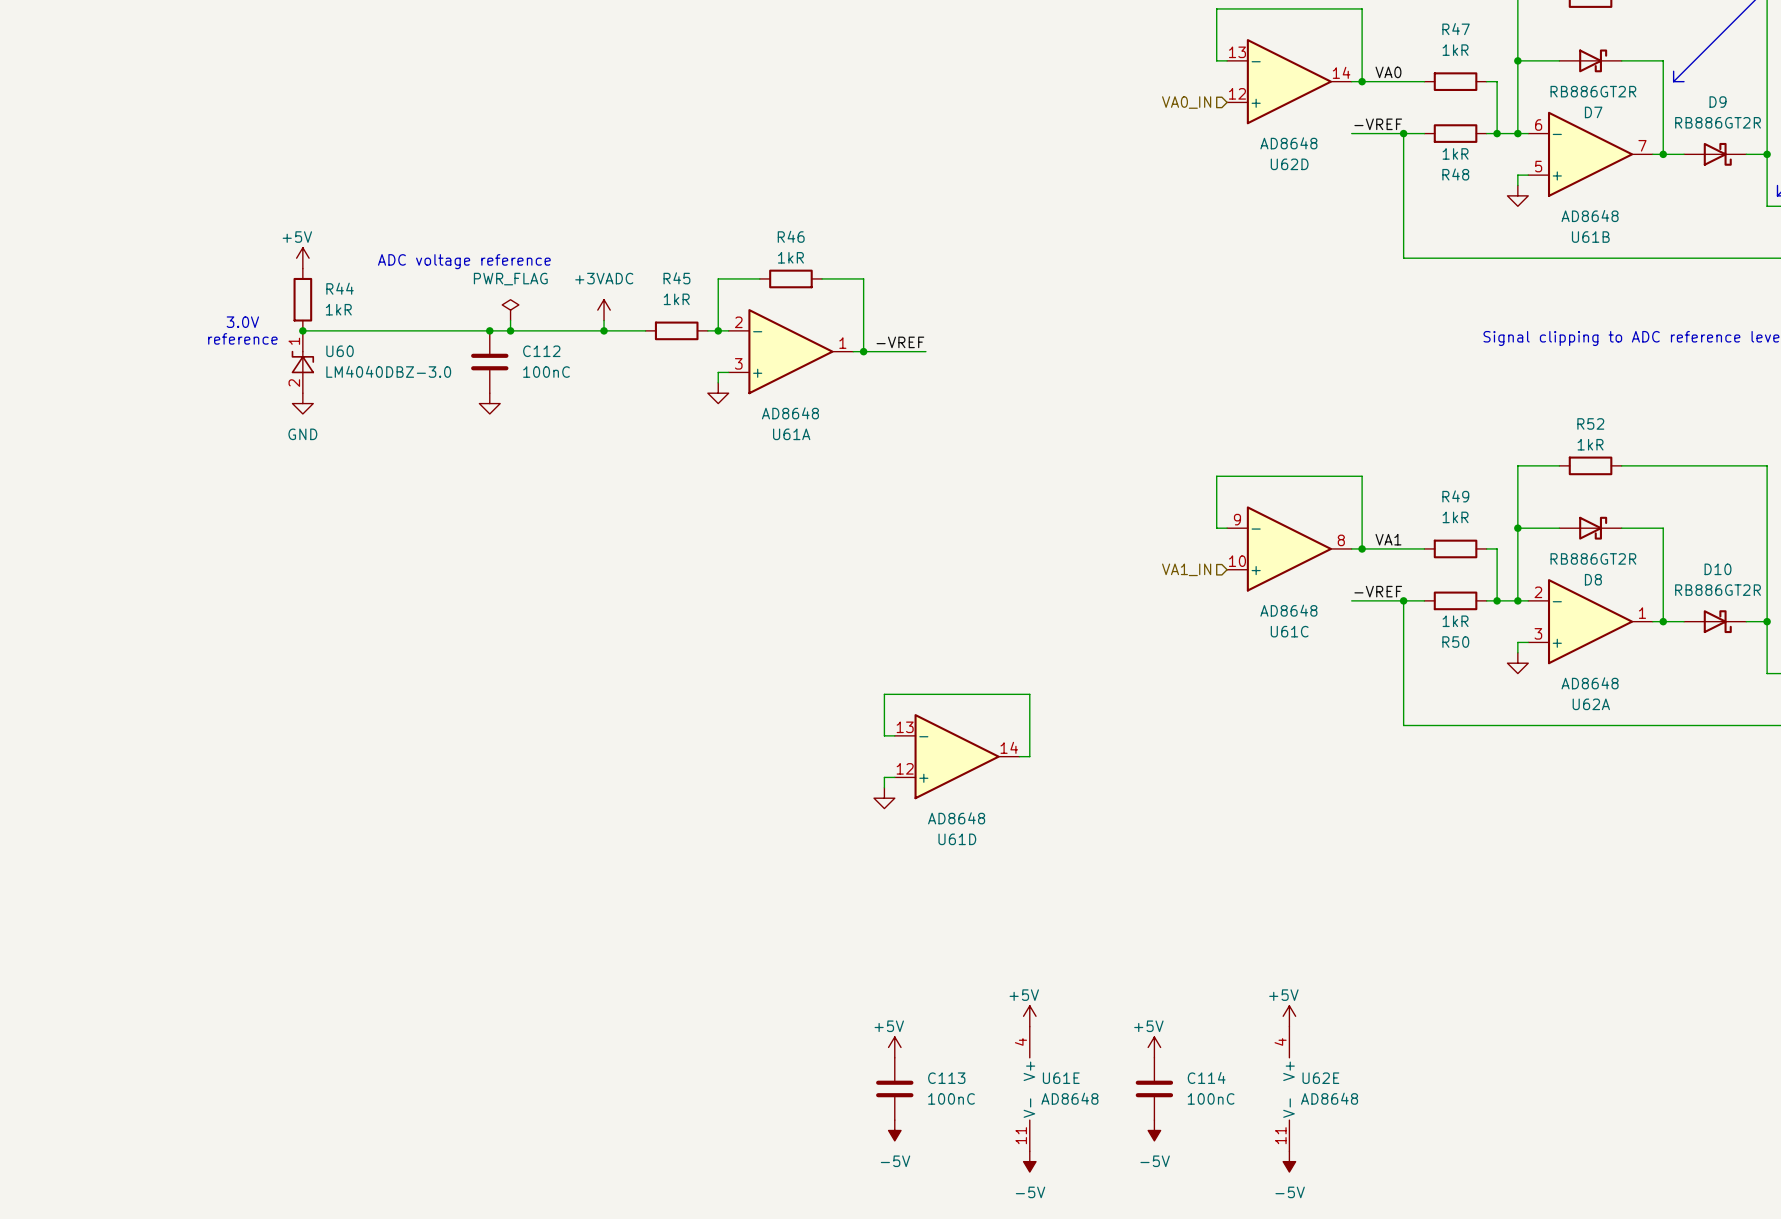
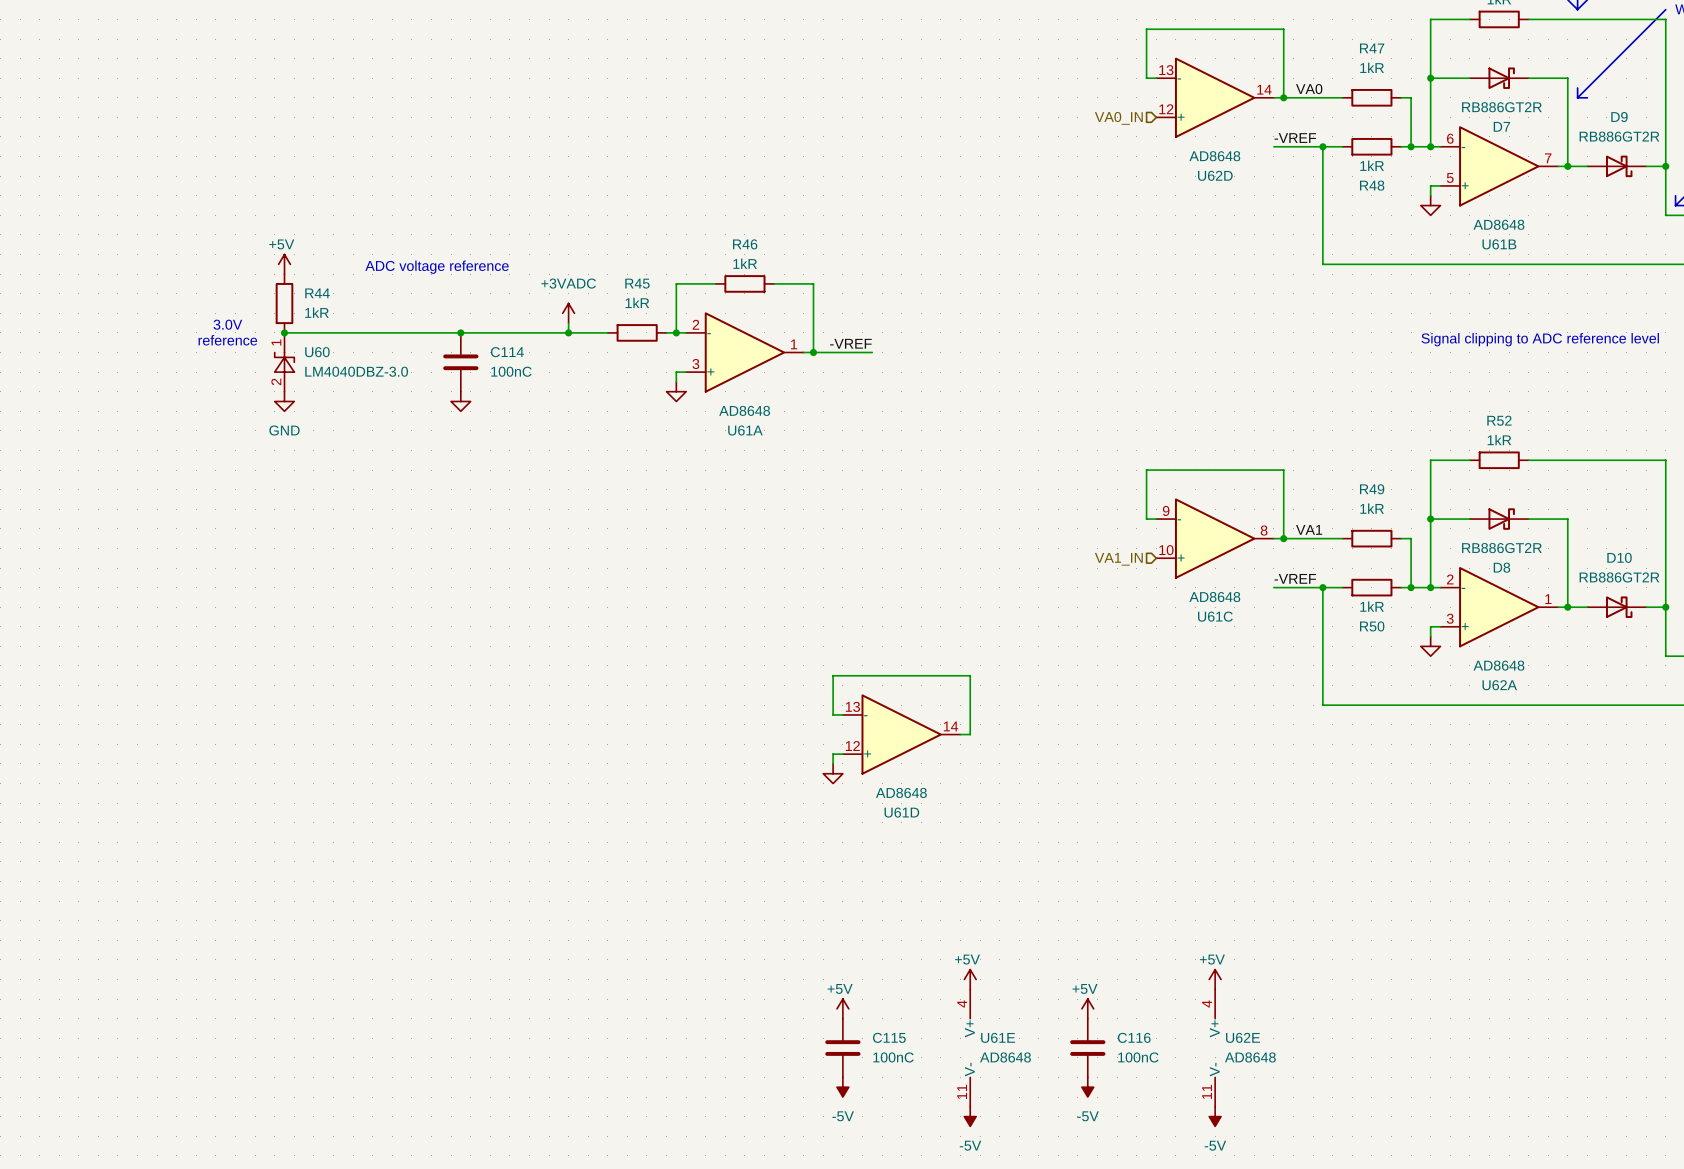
power symbol: PWR_FLAG (510, 310) -> none
wire: (510, 320) (510, 330) -> none
junction: (510, 330) -> none
C112 name: C112 (541, 351) -> C114 (507, 352)
C114 name: C114 (1206, 1077) -> C116 (1134, 1037)
C113 name: C113 (946, 1078) -> C115 (889, 1037)

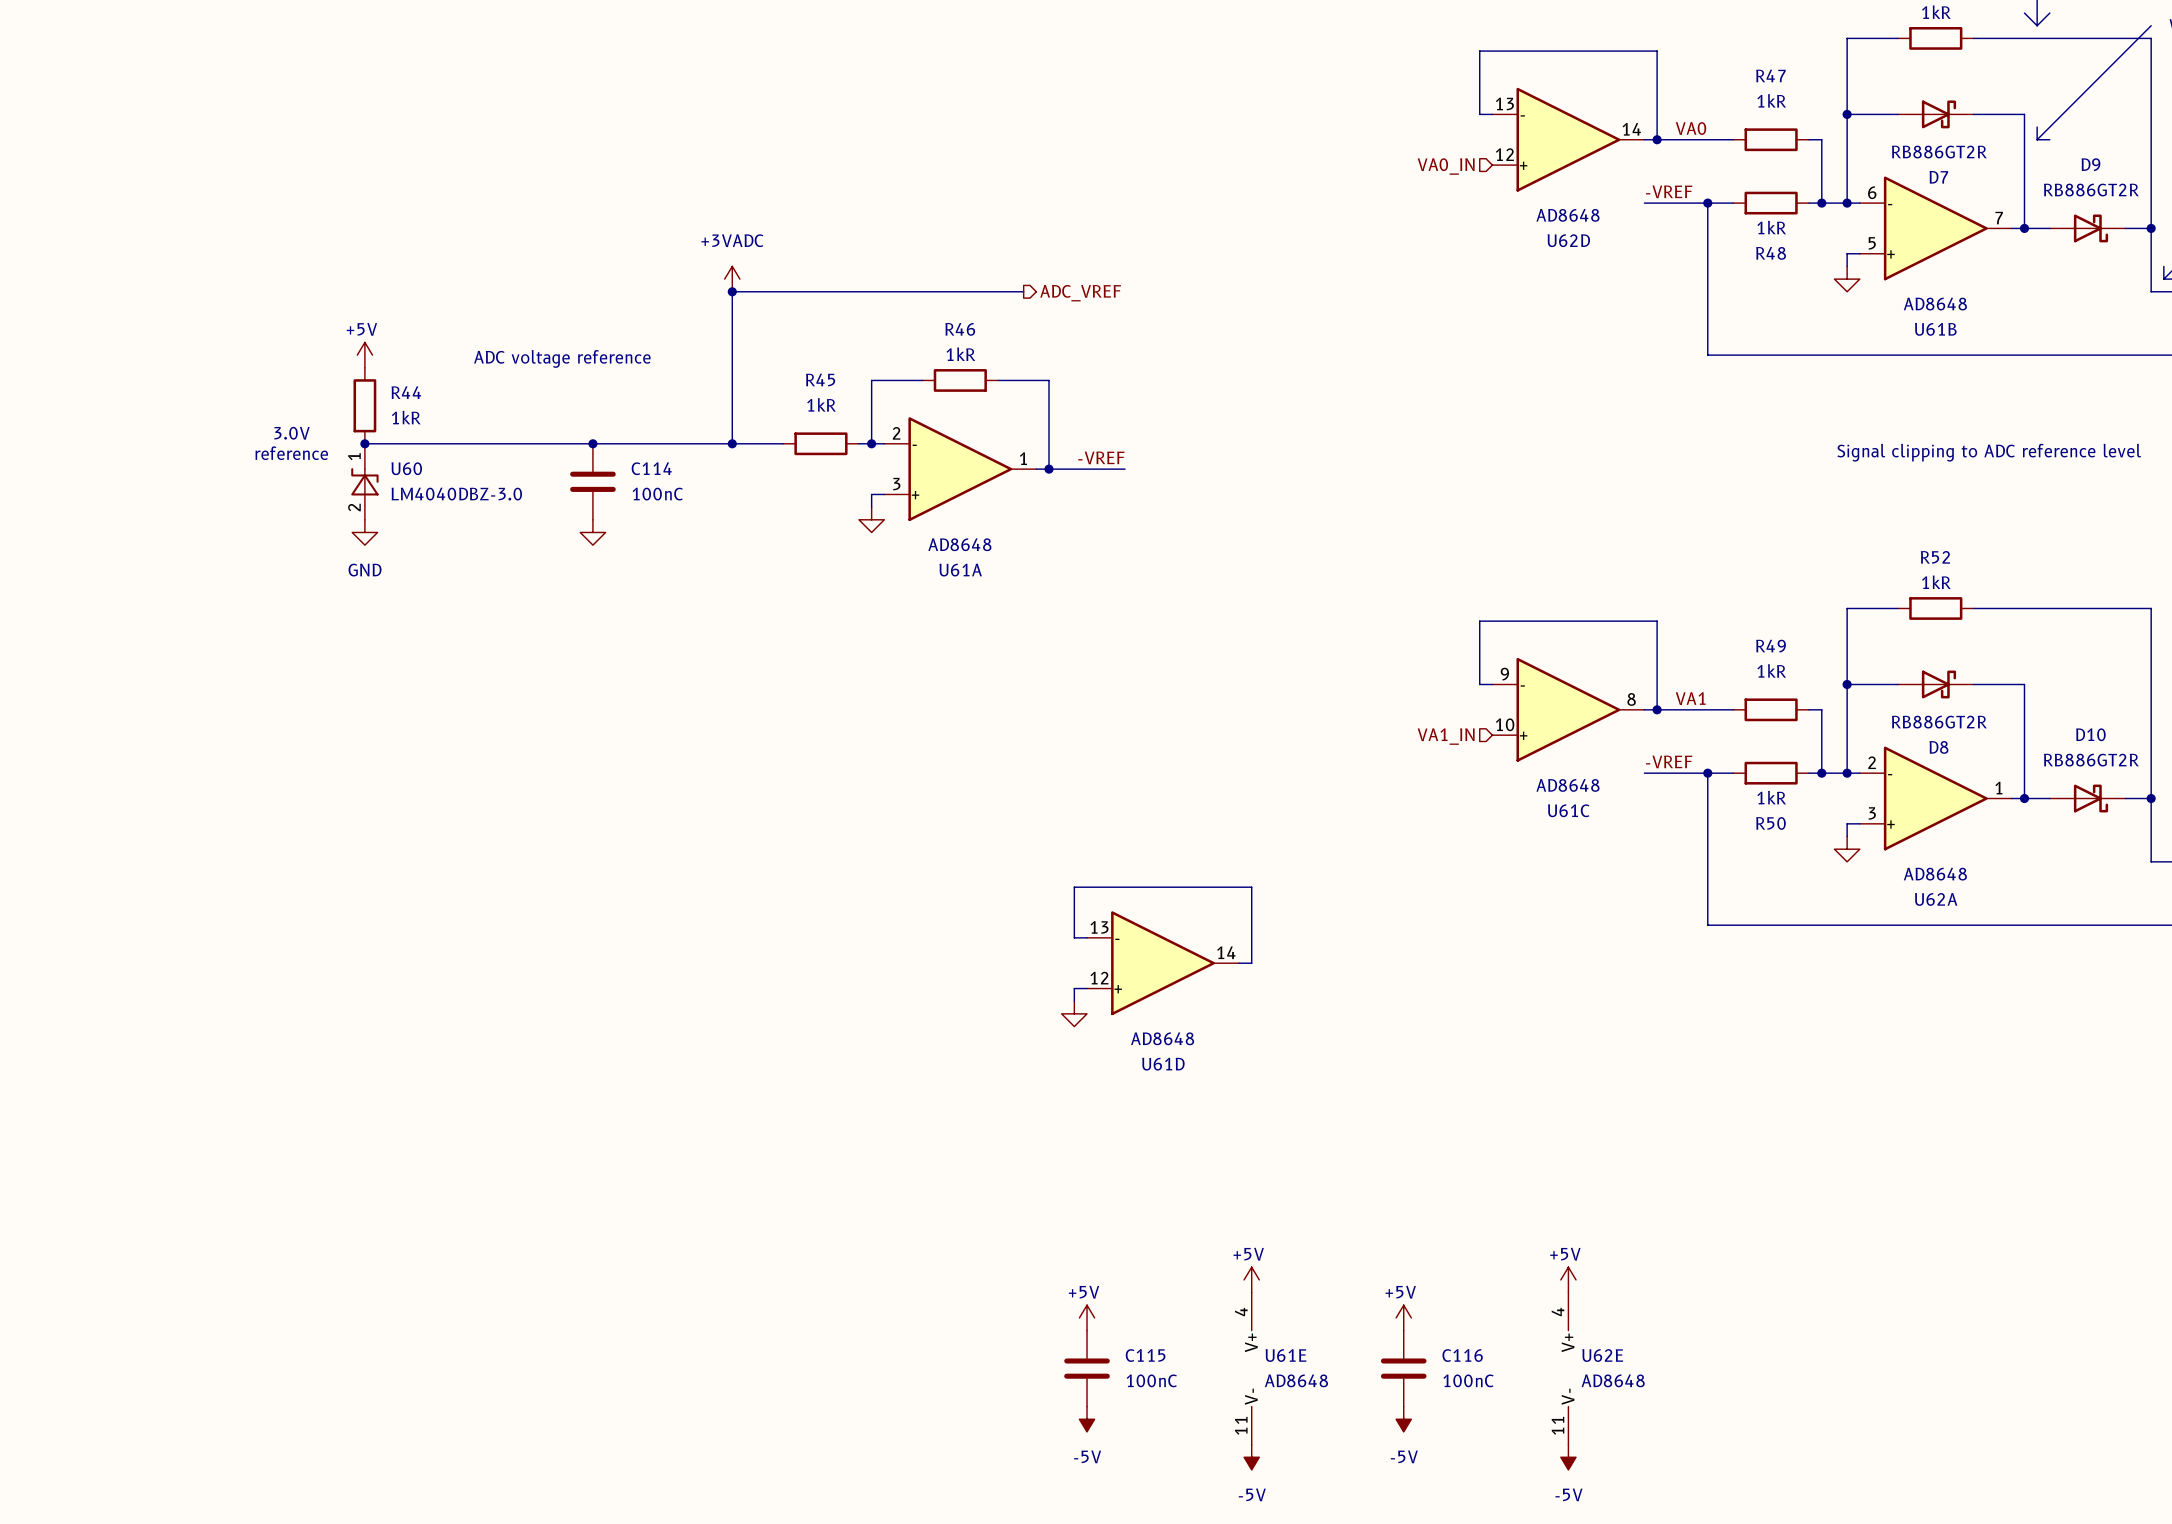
junction: none -> (732, 291)
wire: none -> (1023, 291) (732, 291) (732, 431)
hierarchical label: none -> ADC_VREF (1080, 293)
power symbol position: +3VADC (568, 313) -> +3VADC (732, 279)

